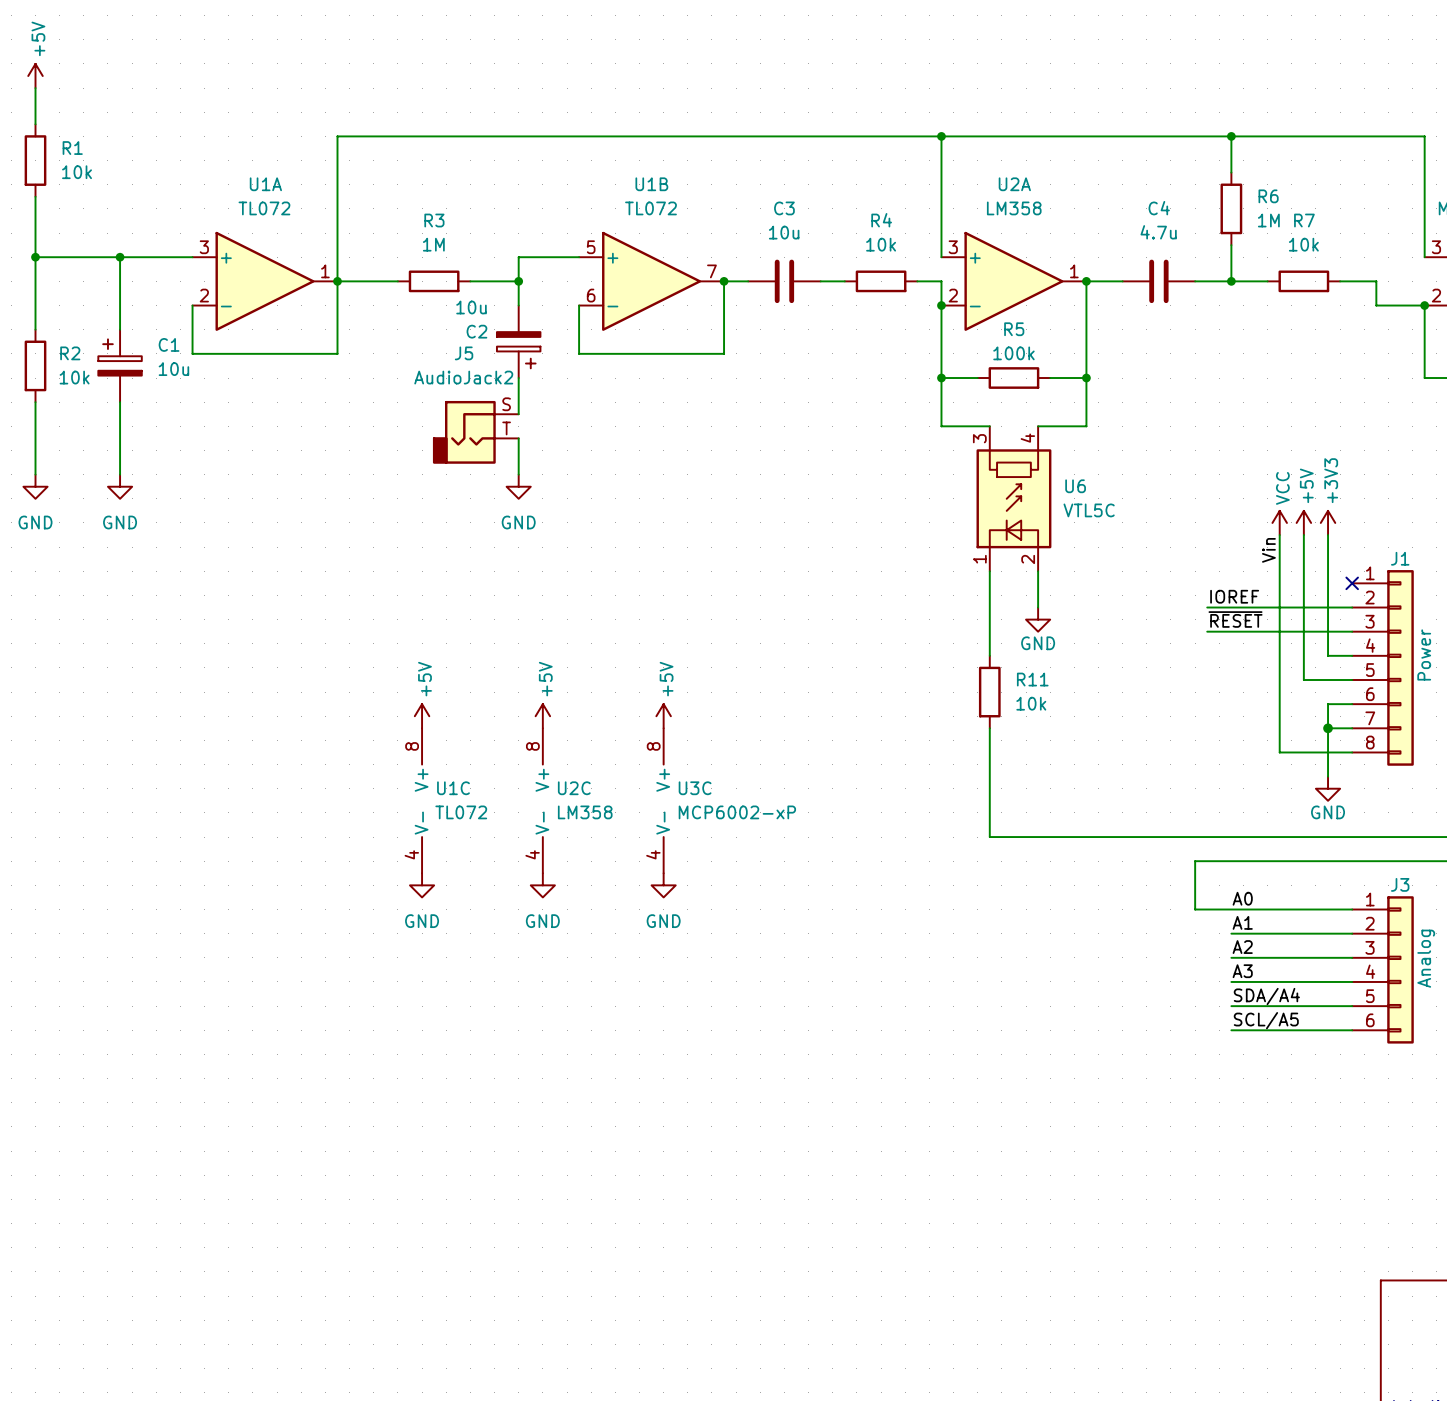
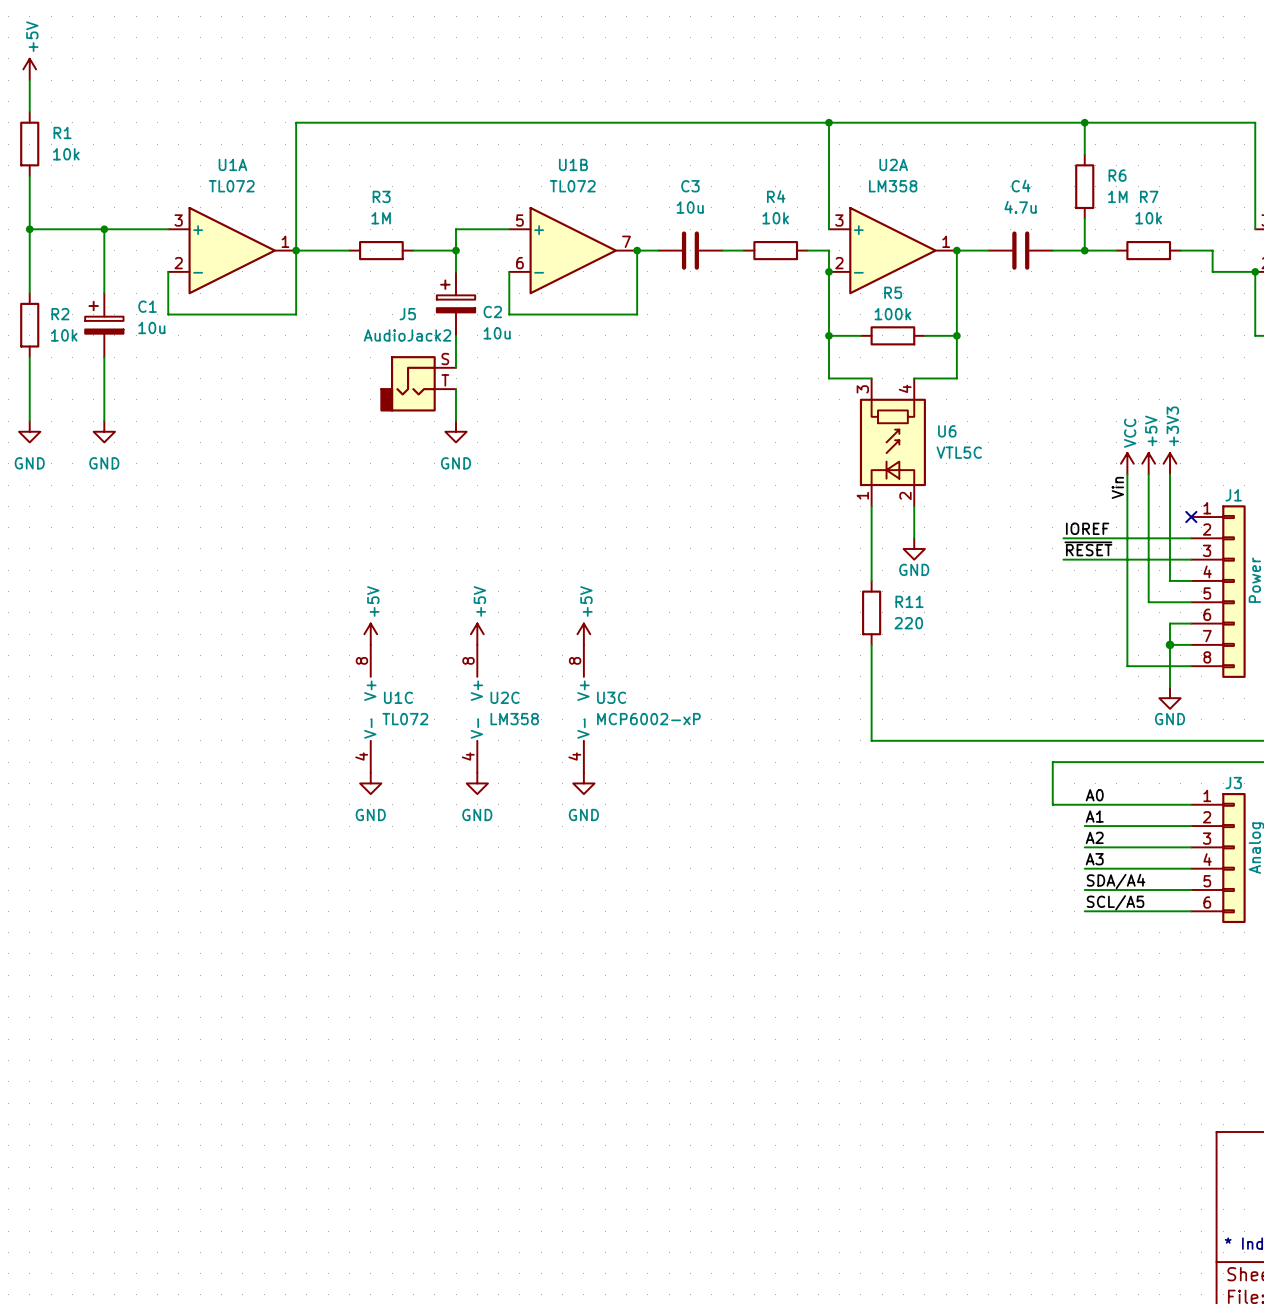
C2 rotation: 0° (518, 350) -> 180° (456, 296)
R11 value: 10k (1031, 703) -> 220 (908, 623)

